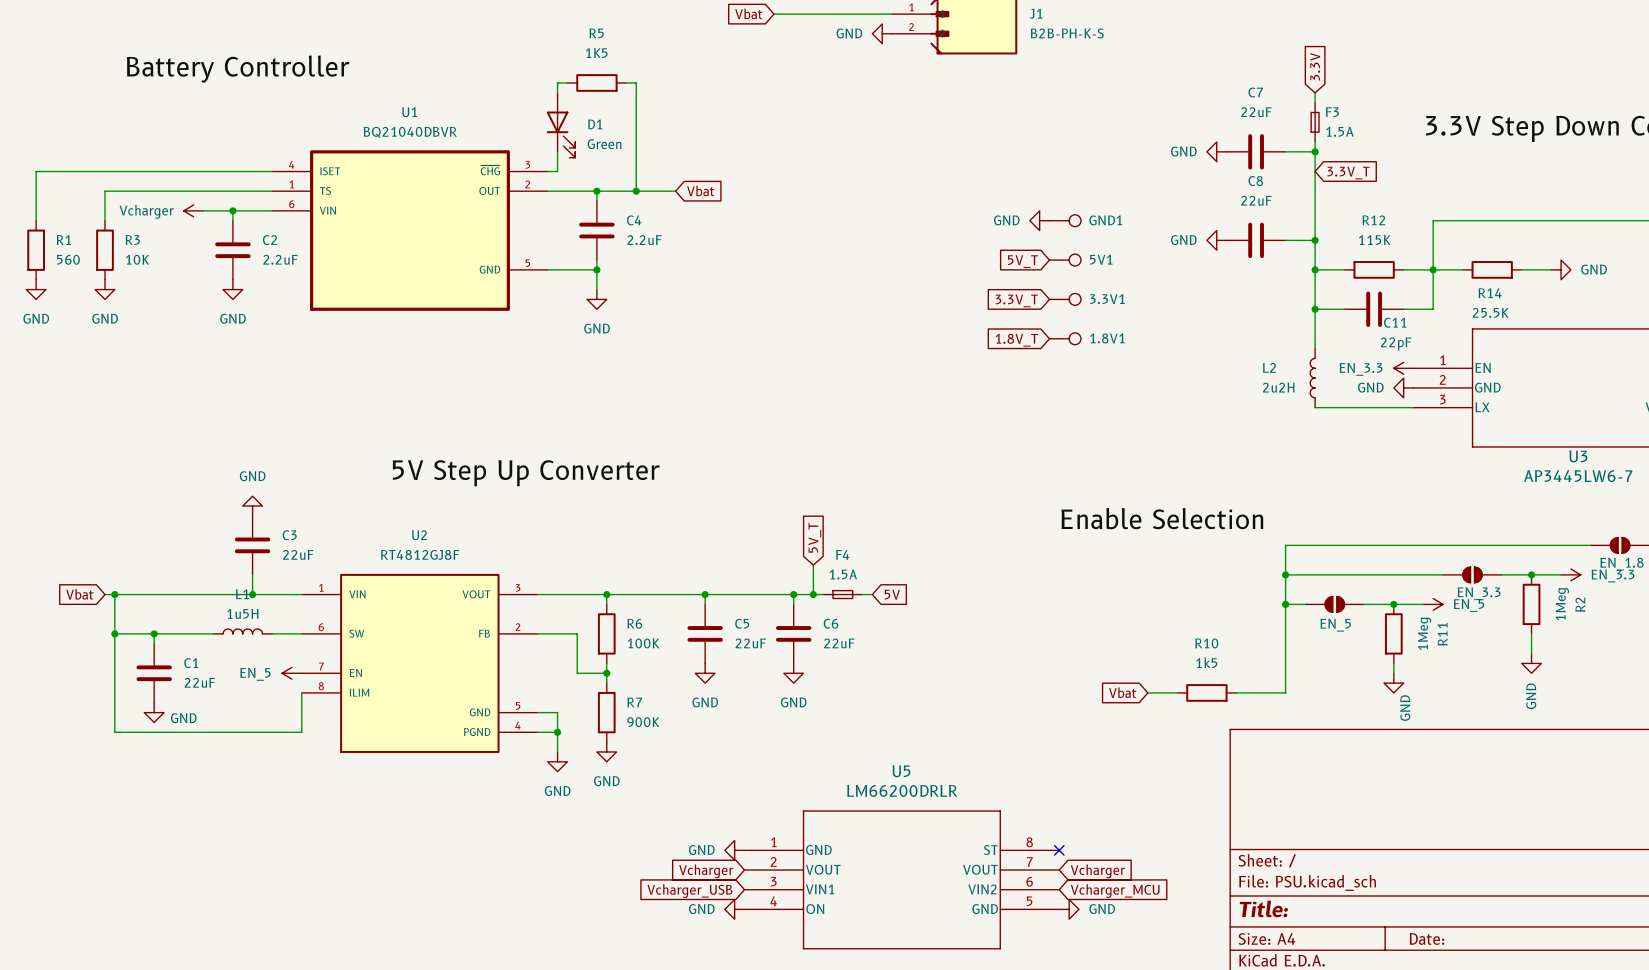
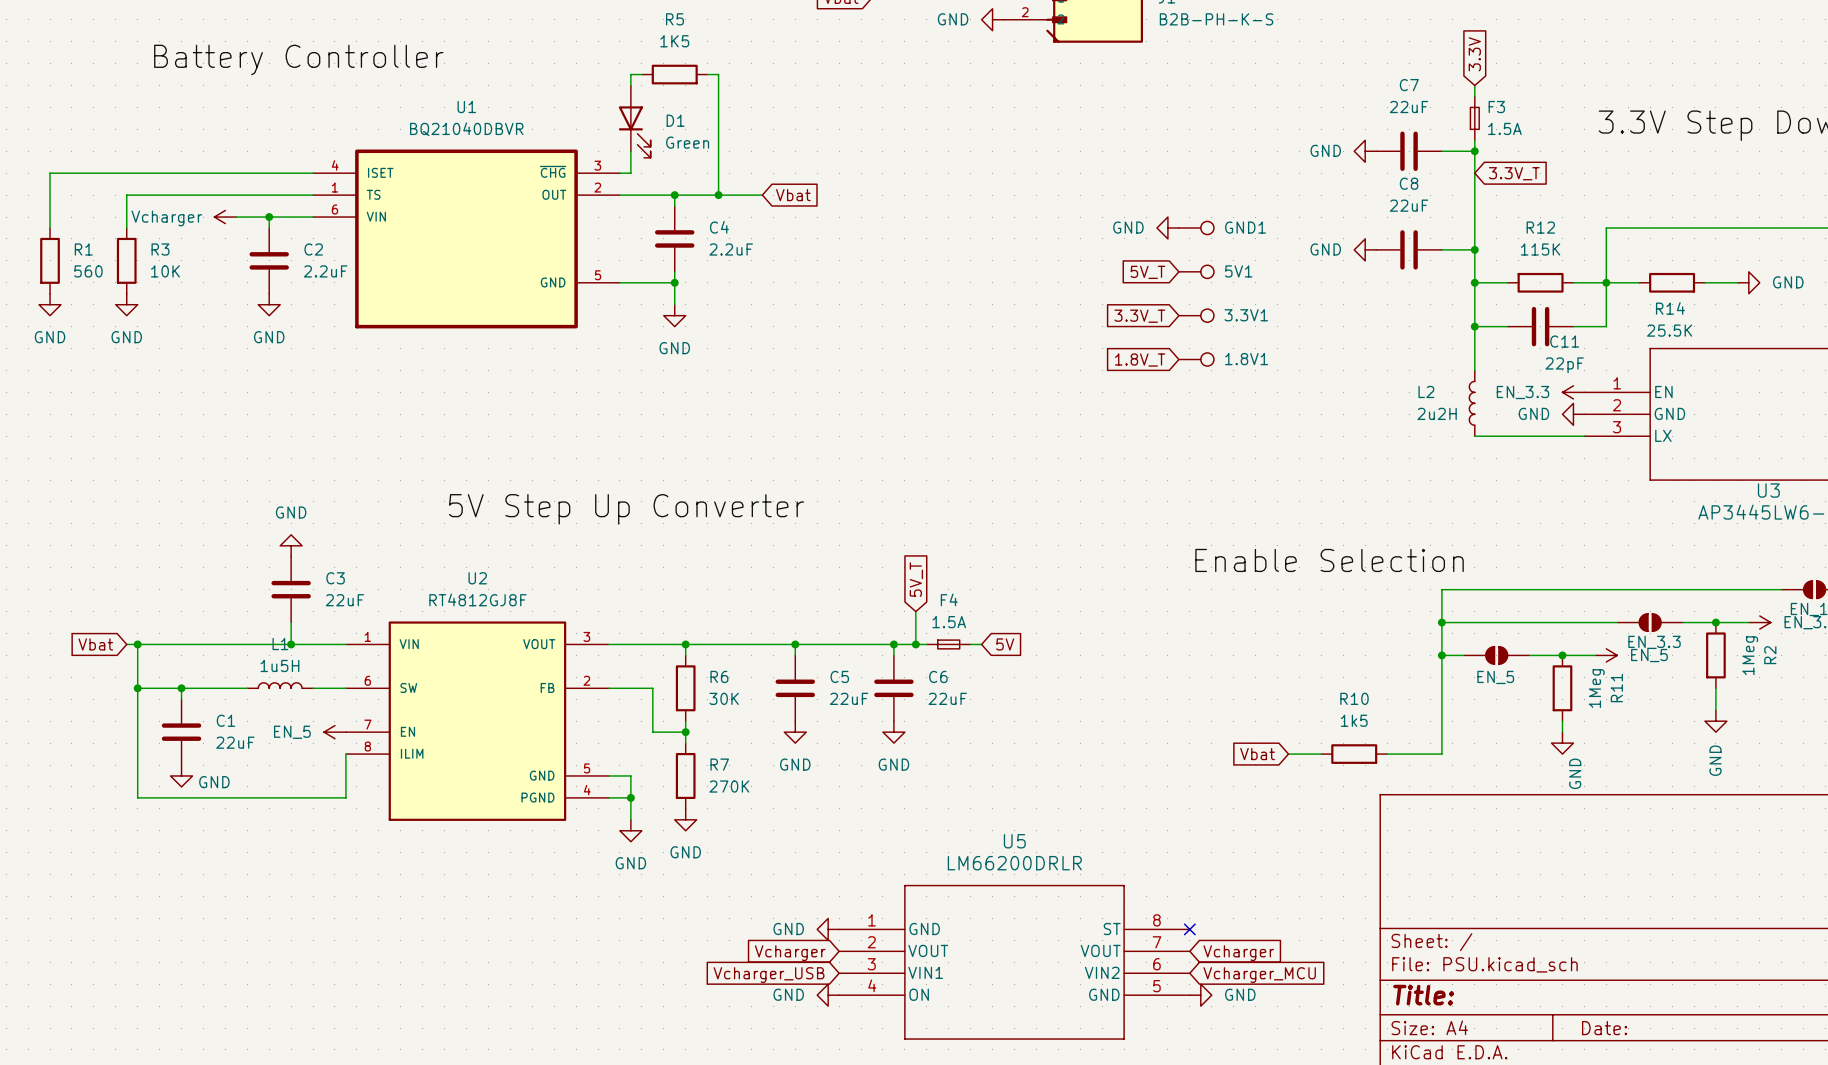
R6 value: 100K (643, 643) -> 30K (724, 698)
R7 value: 900K (643, 722) -> 270K (729, 786)

